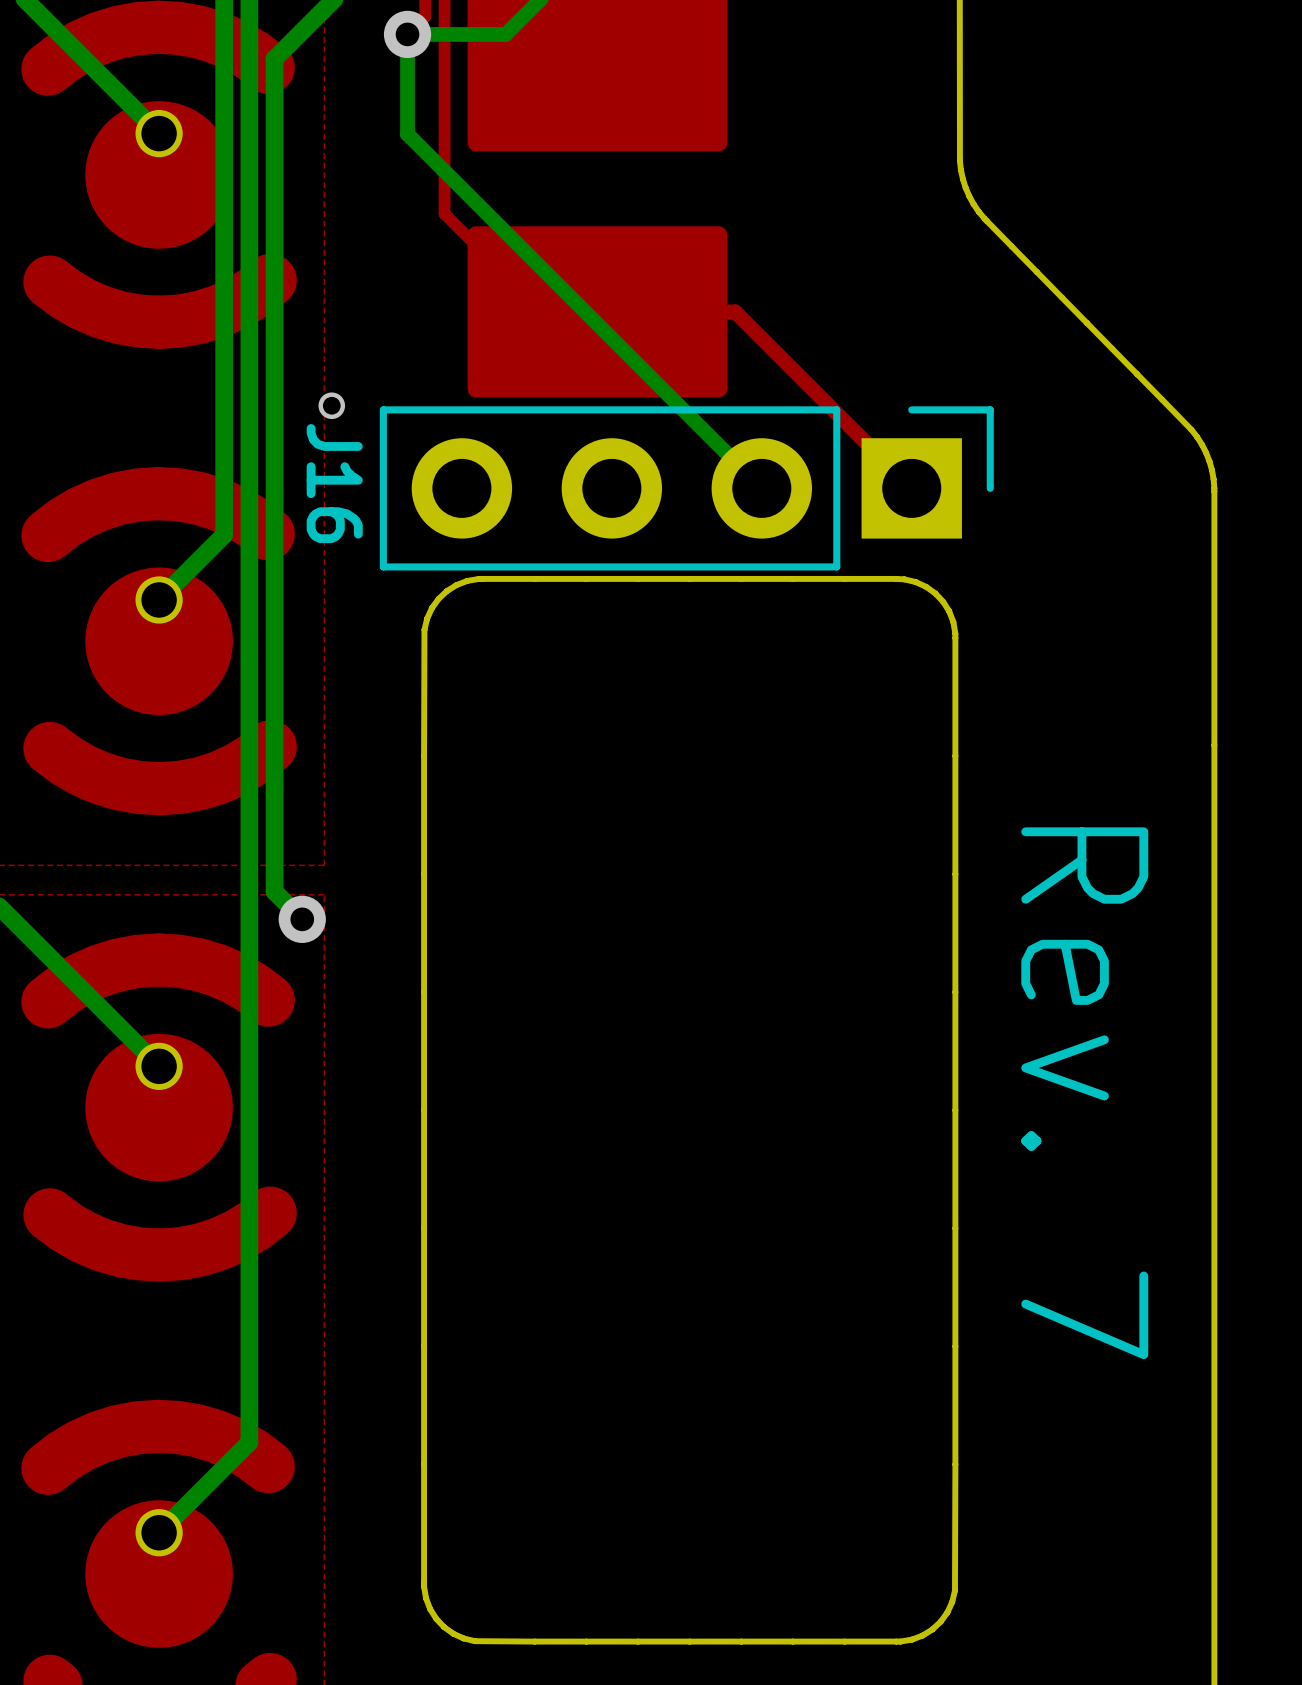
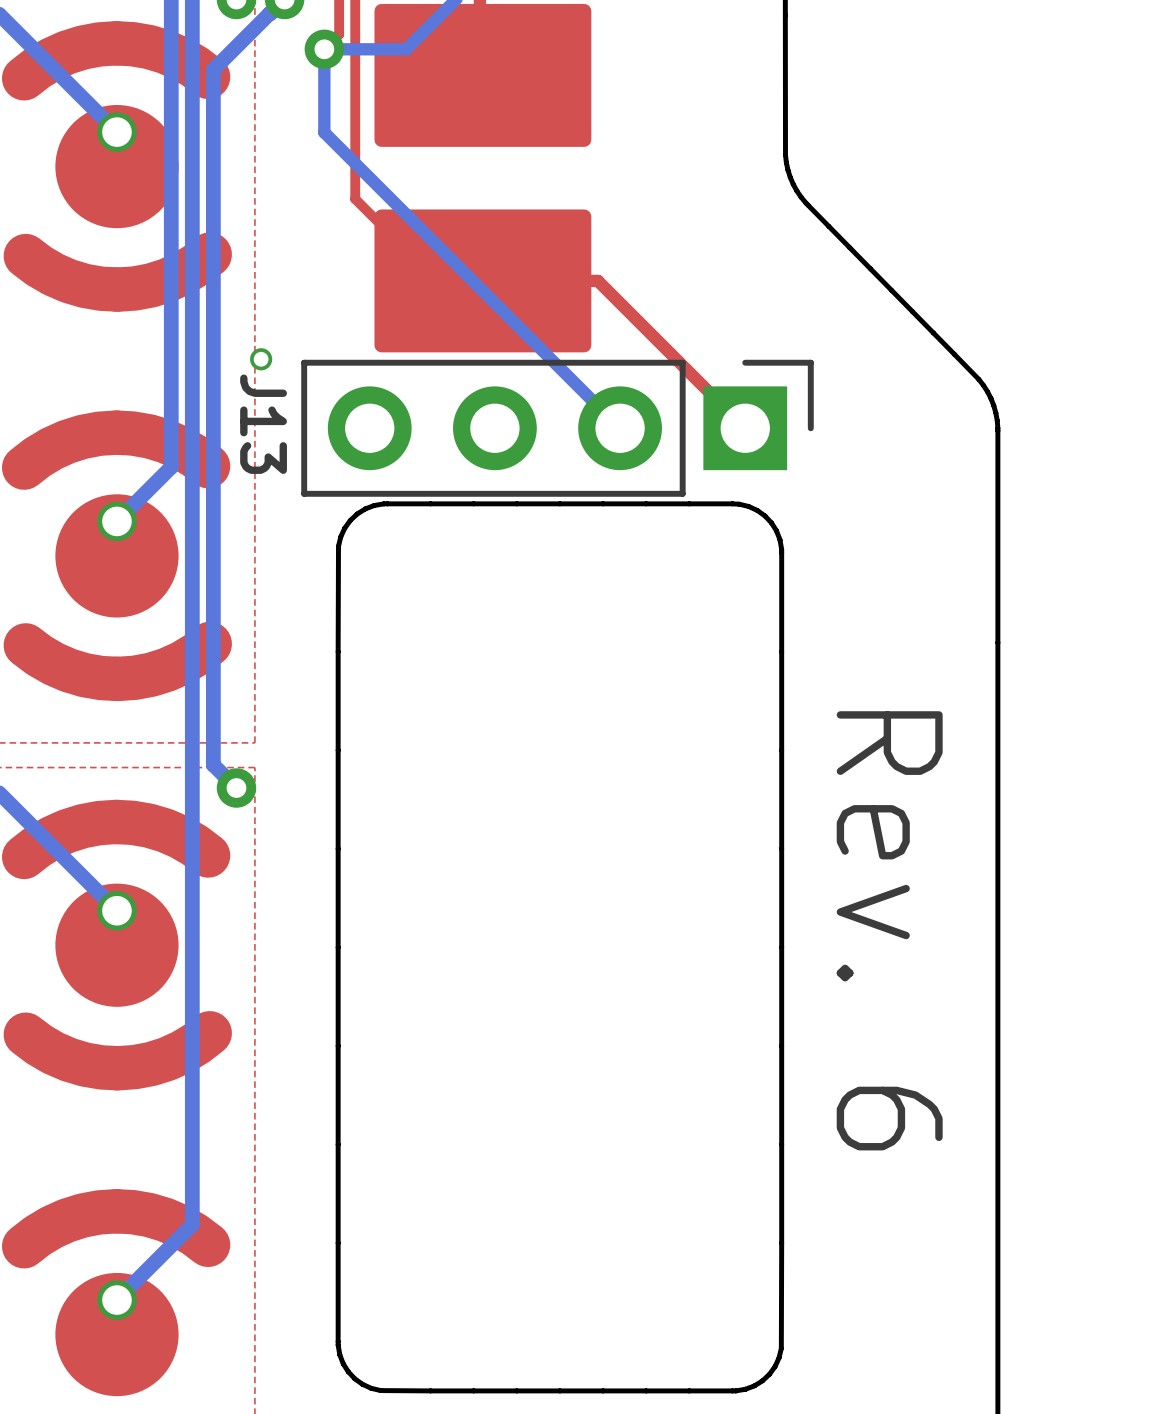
J16 name: J16 (334, 483) -> J13 (263, 424)
text: Rev. 7 (1084, 1093) -> Rev. 6 (889, 930)

